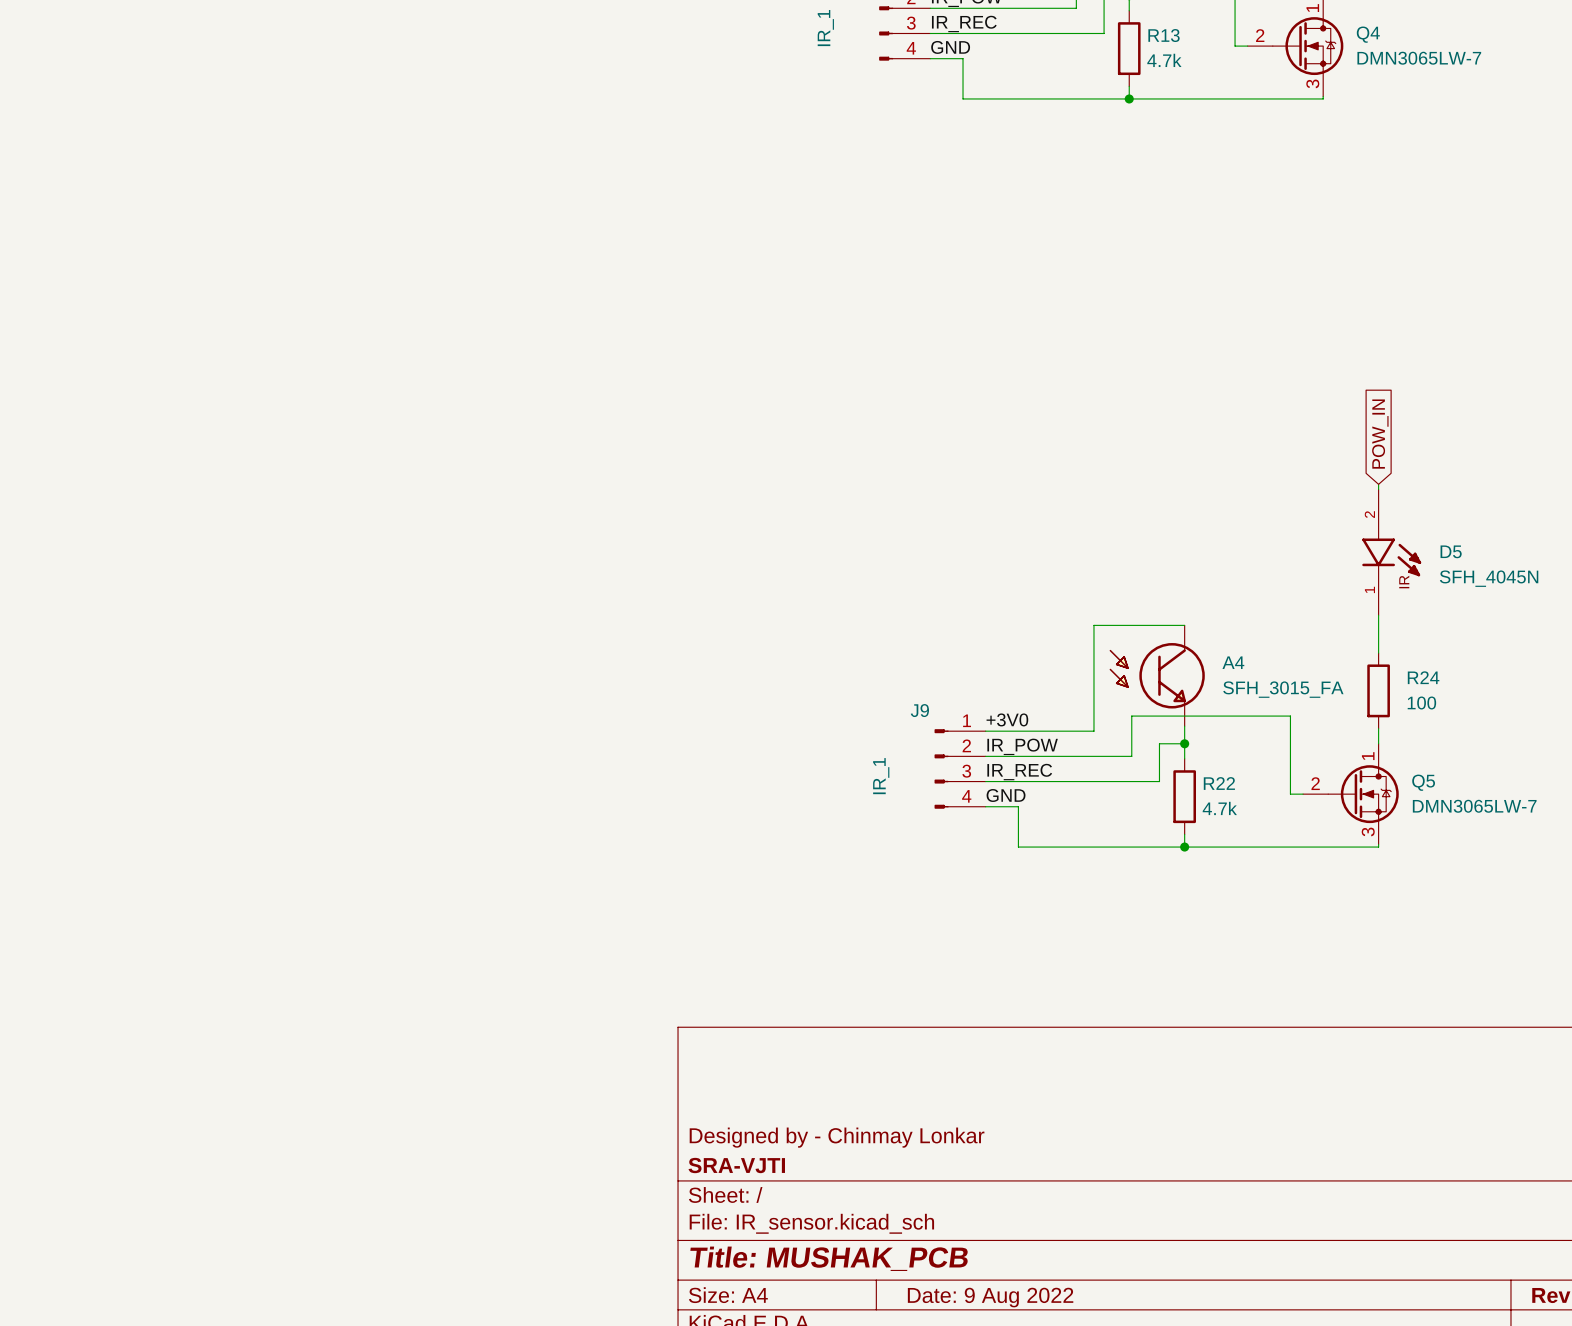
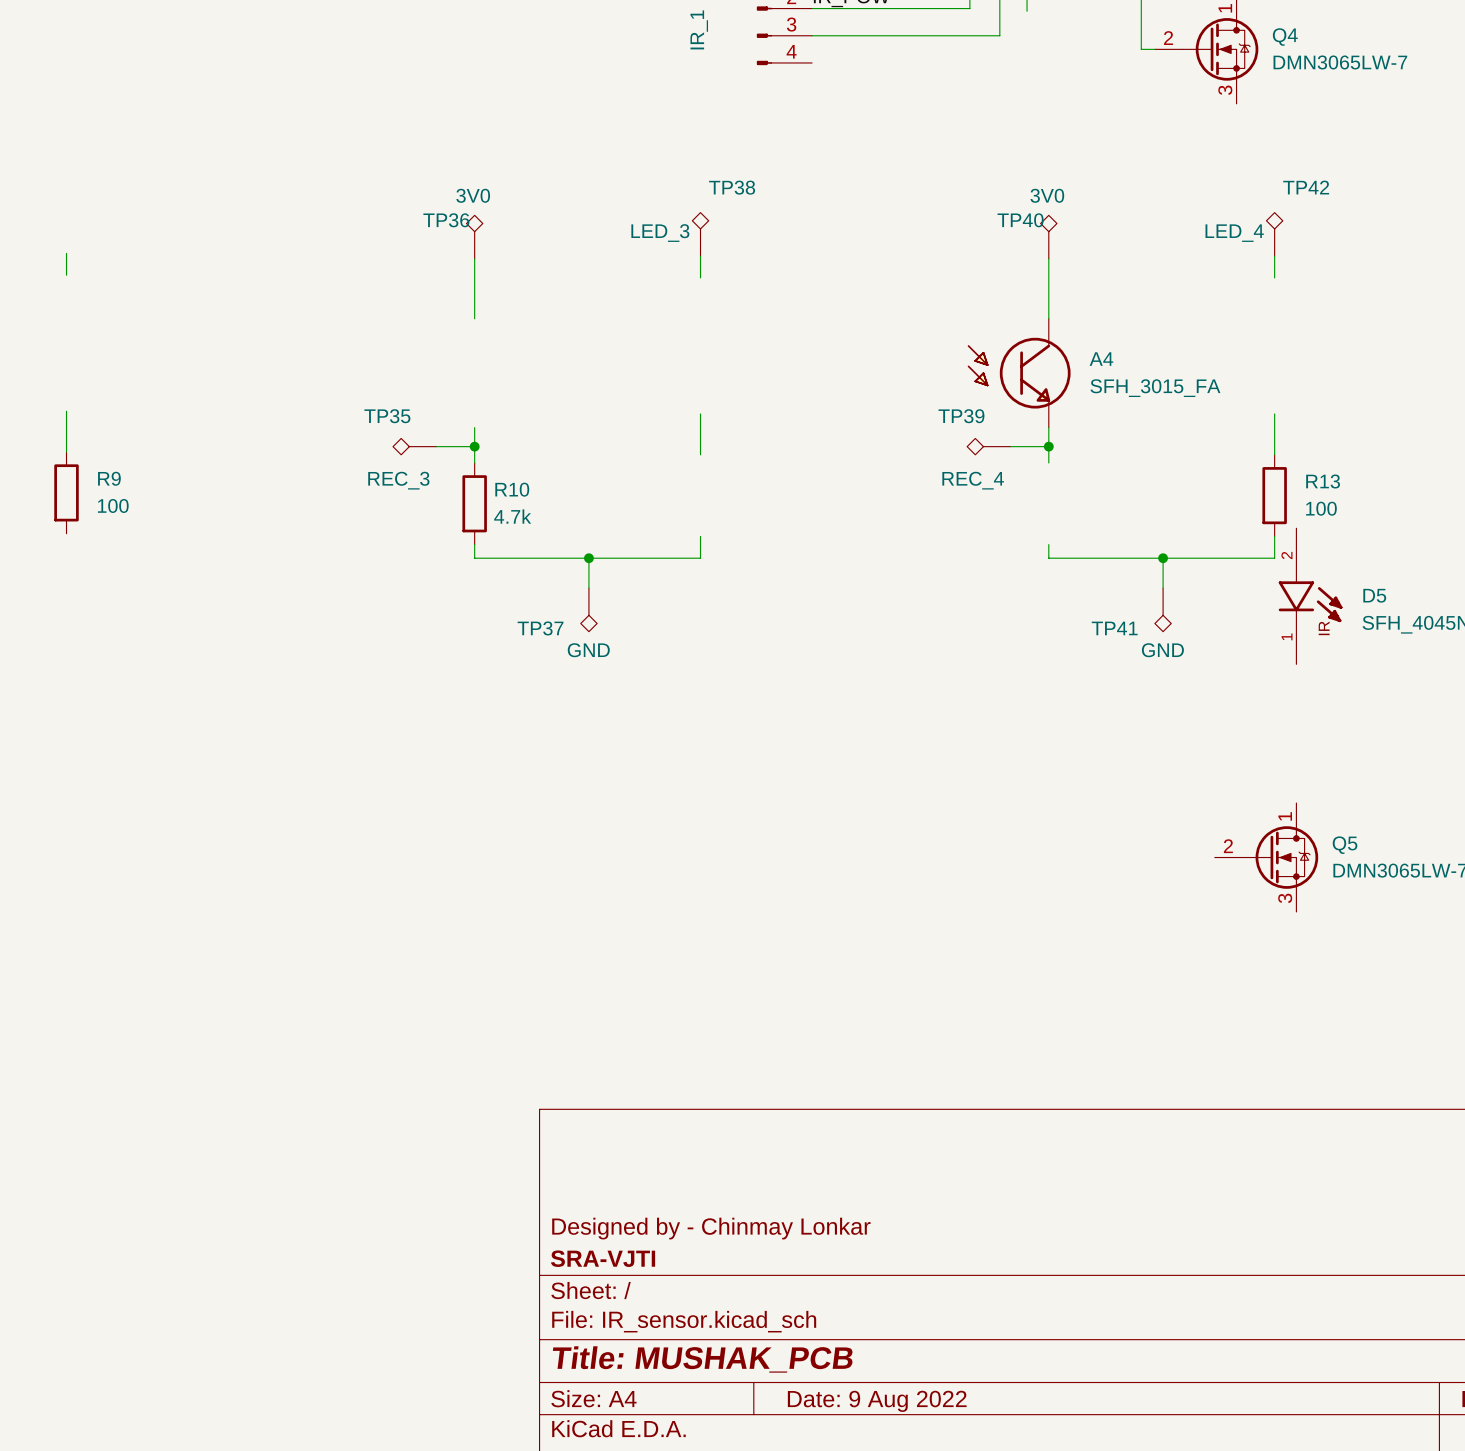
label: IR_REC (964, 23) -> none
R13 name position: R13 (1164, 35) -> R13 (1323, 481)
label: GND (950, 47) -> none
R13 position: (1129, 48) -> (1274, 495)
wire: (930, 58) (963, 58) (963, 98) (1323, 98) (1323, 96) -> none
R13 value: 4.7k (1164, 60) -> 100 (1321, 508)
wire: (1129, 86) (1129, 98) -> none
junction: (1129, 98) -> none
TP38: none -> LED_3 (700, 234)
TP42: none -> LED_4 (1274, 234)
TP36: none -> 3V0 (474, 237)
TP40: none -> 3V0 (1048, 237)
wire: none -> (66, 253) (66, 275)
wire: none -> (700, 256) (700, 277)
wire: none -> (1274, 256) (1274, 277)
wire: none -> (474, 258) (474, 318)
wire: none -> (1048, 258) (1048, 318)
wire: none -> (66, 411) (66, 452)
wire: none -> (700, 413) (700, 454)
wire: none -> (474, 427) (474, 462)
wire: none -> (1048, 427) (1048, 462)
TP35: none -> REC_3 (414, 446)
wire: none -> (436, 446) (474, 446)
junction: none -> (474, 446)
TP39: none -> REC_4 (988, 446)
wire: none -> (1010, 446) (1048, 446)
junction: none -> (1048, 446)
global label: POW_IN (1380, 434) -> none
R9: none -> 100 (66, 492)
R10: none -> 4.7k (474, 503)
wire: (1378, 484) (1378, 489) -> none
wire: none -> (700, 536) (700, 558) (474, 558) (474, 544)
wire: none -> (1274, 536) (1274, 558) (1048, 558) (1048, 544)
wire: none -> (588, 558) (588, 588)
junction: none -> (588, 558)
wire: none -> (1163, 558) (1163, 588)
junction: none -> (1163, 558)
TP37: none -> GND (588, 609)
TP41: none -> GND (1163, 609)
wire: (1378, 615) (1378, 653) -> (1274, 413) (1274, 454)
wire: (1184, 625) (1093, 625) (1093, 731) (985, 731) -> none
A4 position: (1157, 675) -> (1019, 373)
R24: 100 (1378, 690) -> none
label: +3V0 (1007, 719) -> none
wire: (1184, 726) (1184, 758) -> none
wire: (1378, 728) (1378, 743) -> none
wire: (1184, 743) (1159, 743) (1159, 781) (985, 781) -> none
junction: (1184, 743) -> none
label: IR_POW (1022, 746) -> none
wire: (985, 756) (1131, 756) (1131, 716) (1290, 716) (1290, 794) (1303, 794) -> none
J9: IR_1 (960, 768) -> none
label: IR_REC (1019, 772) -> none
label: GND (1006, 795) -> none
R22: 4.7k (1184, 796) -> none
wire: (985, 806) (1018, 806) (1018, 847) (1378, 847) (1378, 844) -> none
wire: (1184, 834) (1184, 847) -> none
junction: (1184, 847) -> none

